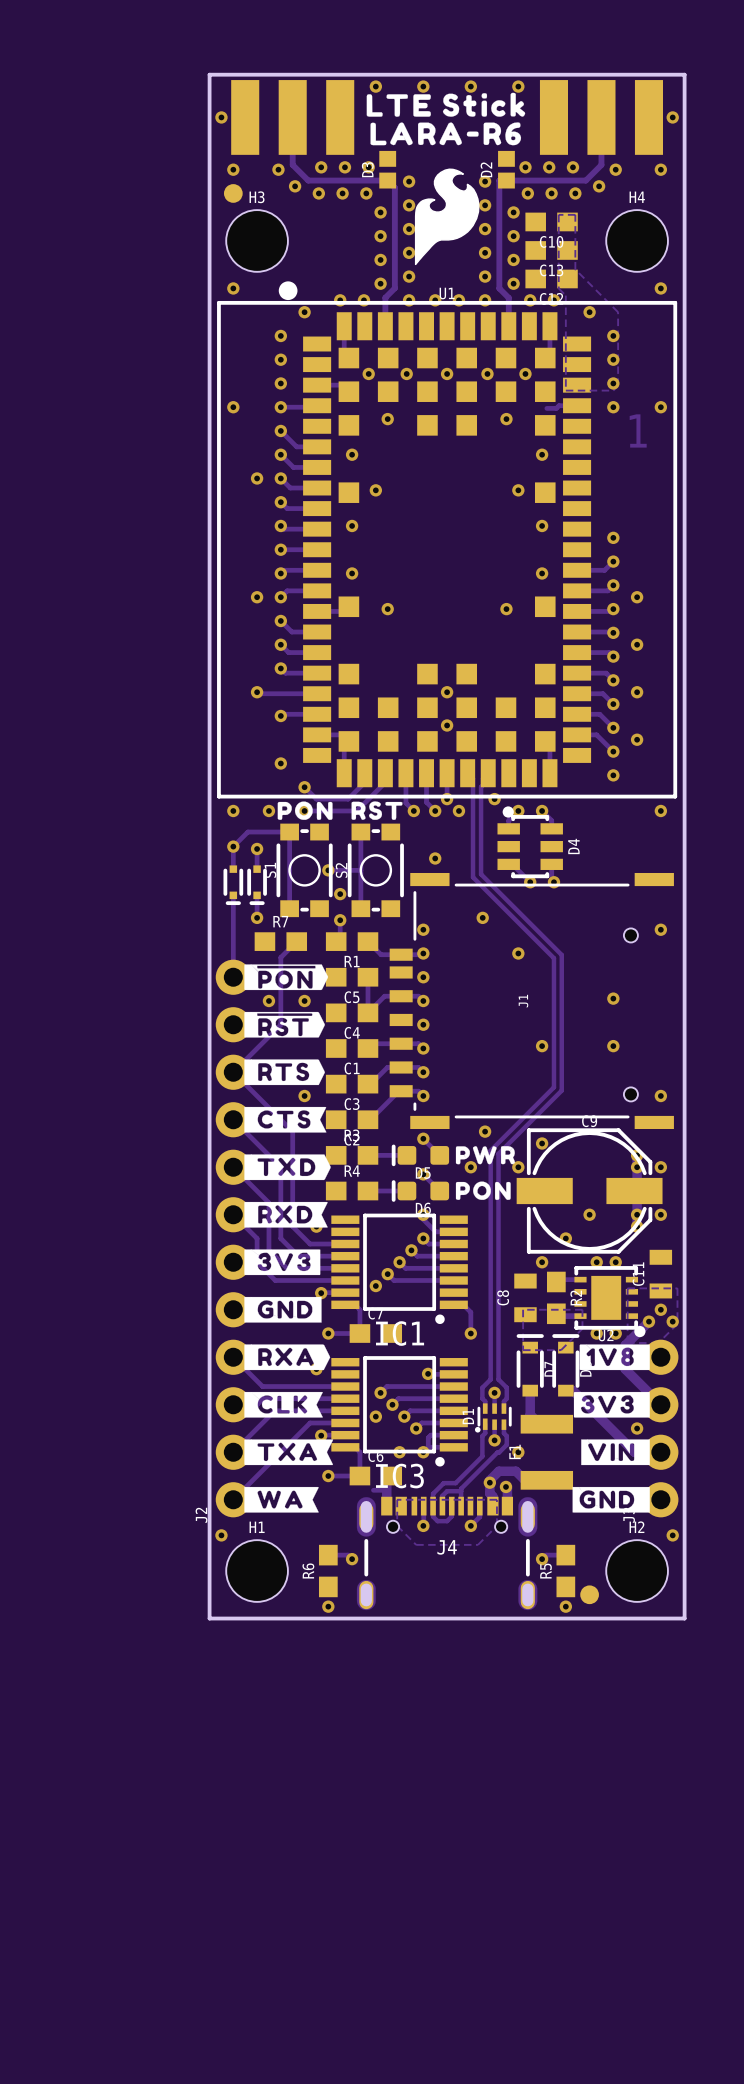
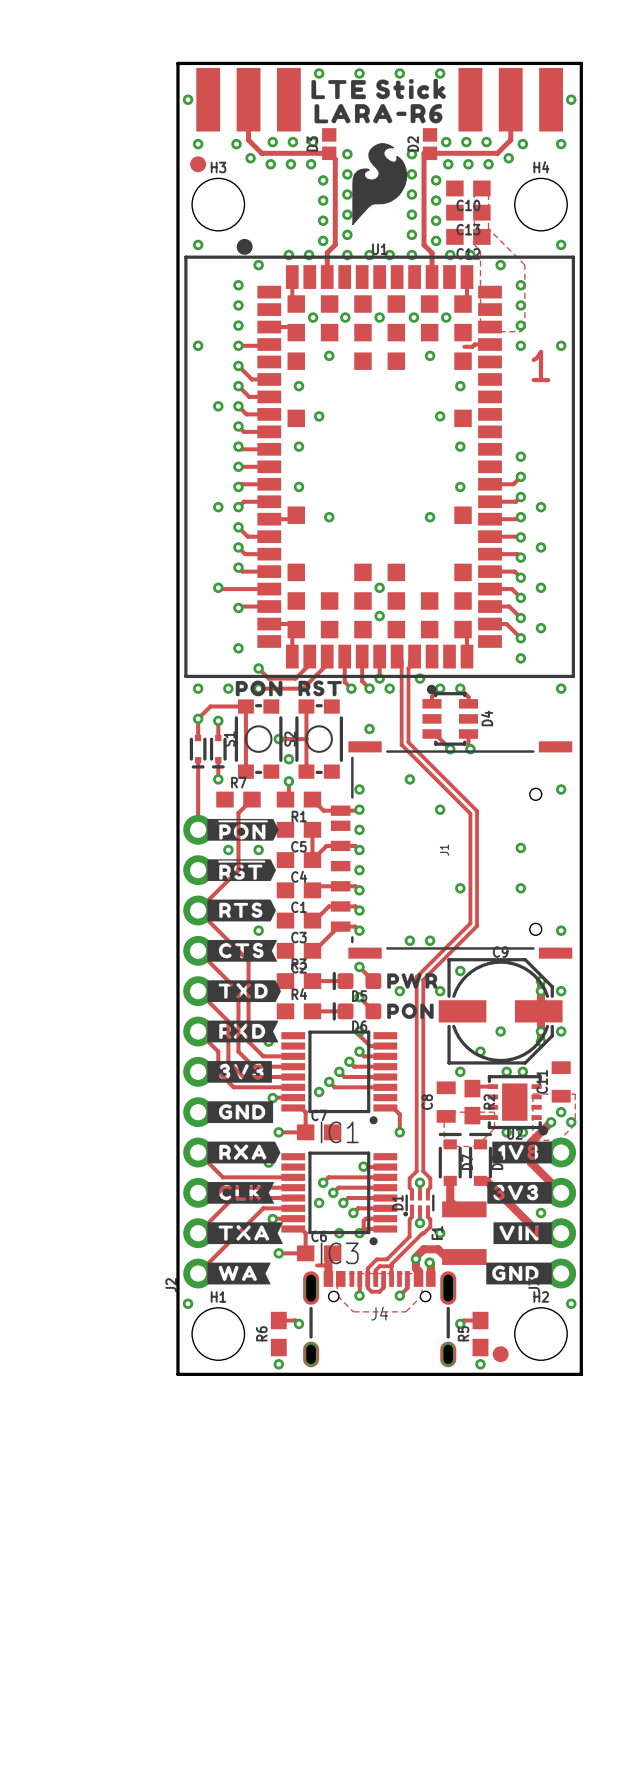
via: none -> (409, 940)
via: none -> (430, 940)
via: (485, 1131) -> none

